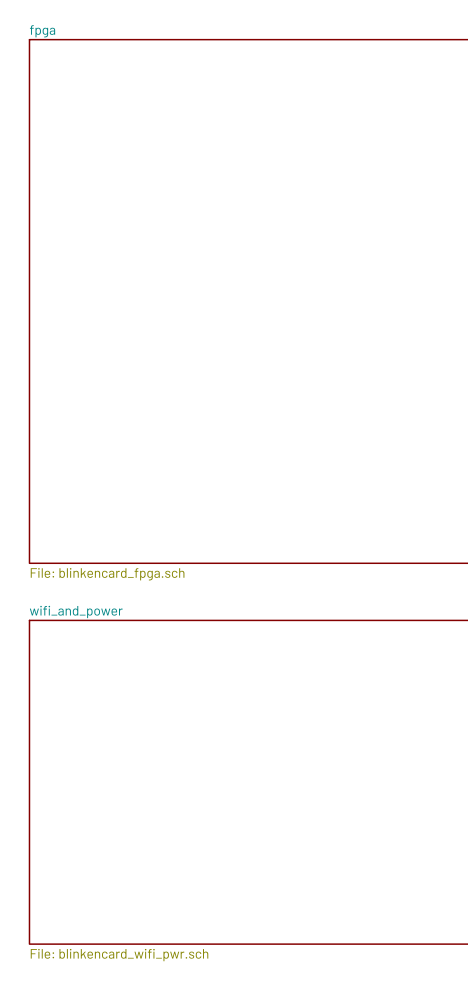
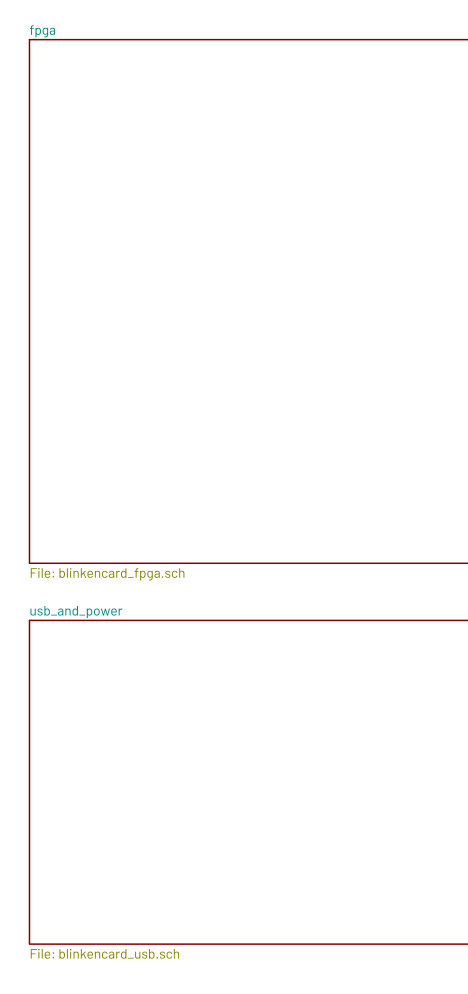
sheet wifi_and_power name: wifi_and_power (76, 611) -> usb_and_power (76, 612)
sheet wifi_and_power value: File: blinkencard_wifi_pwr.sch (119, 955) -> File: blinkencard_usb.sch (104, 953)

